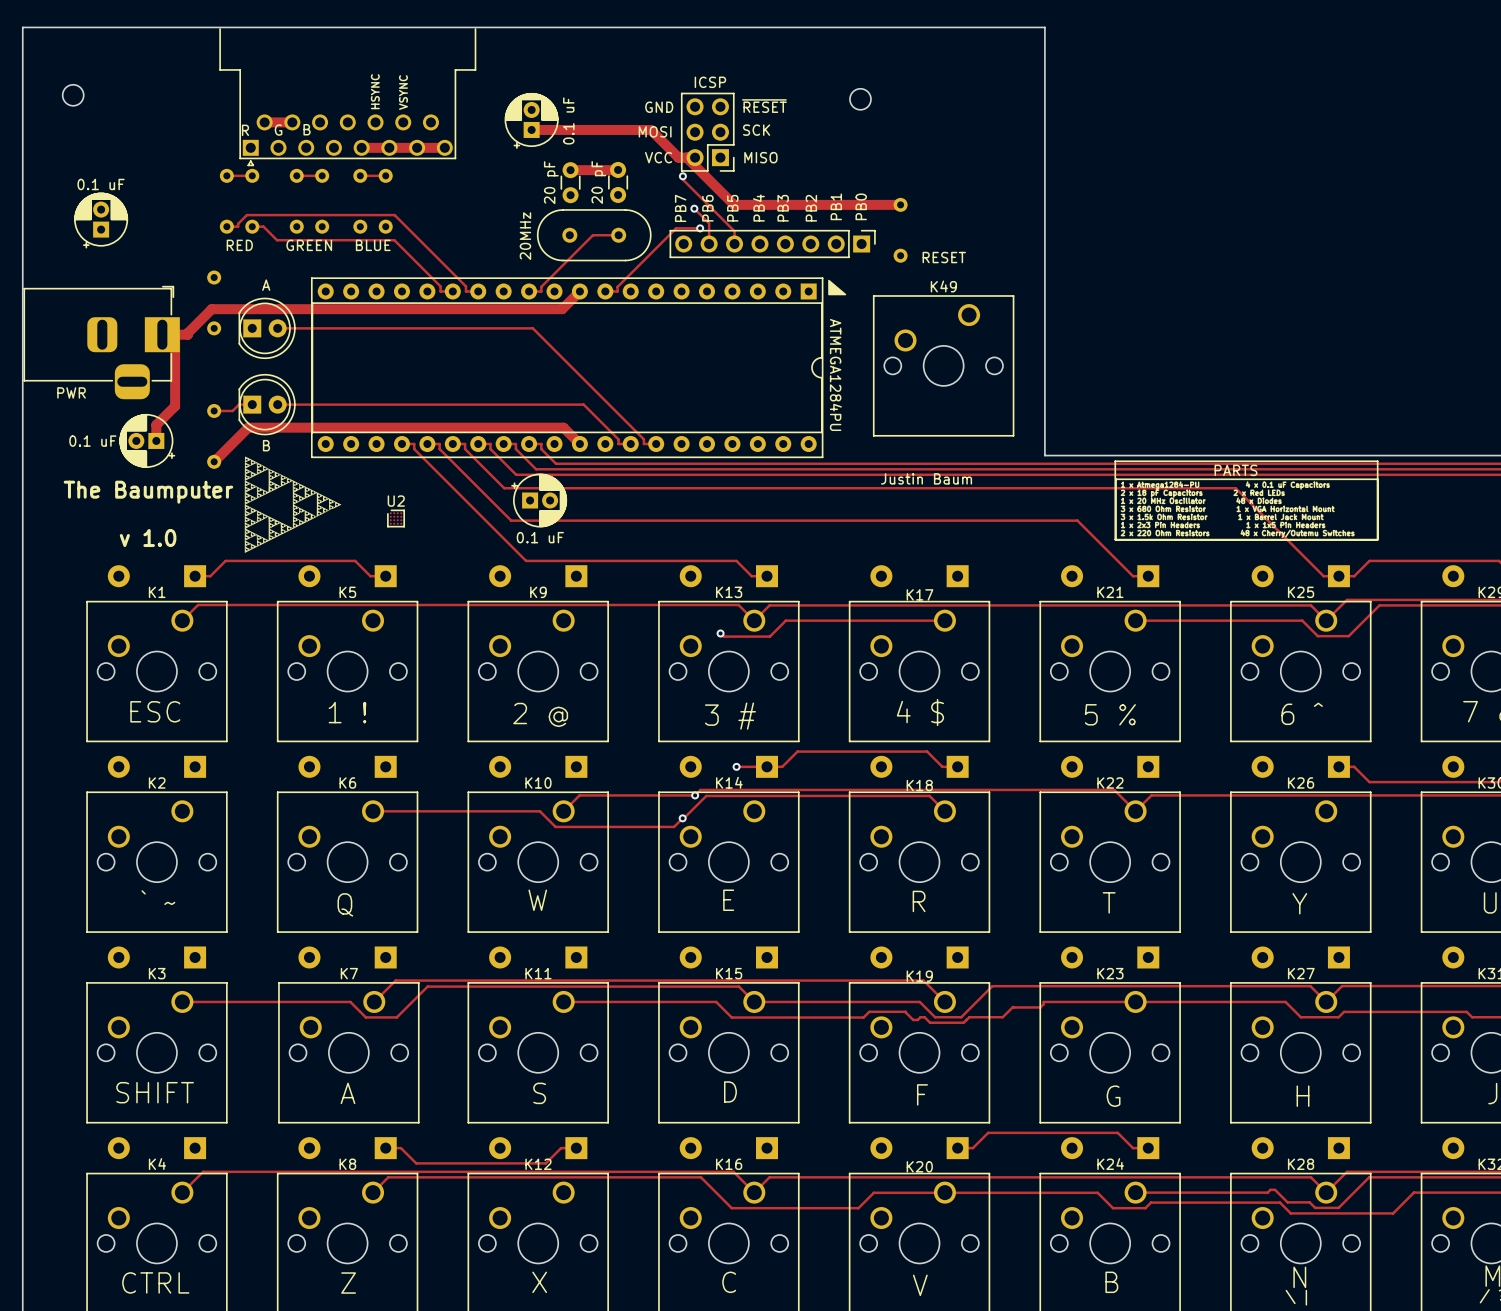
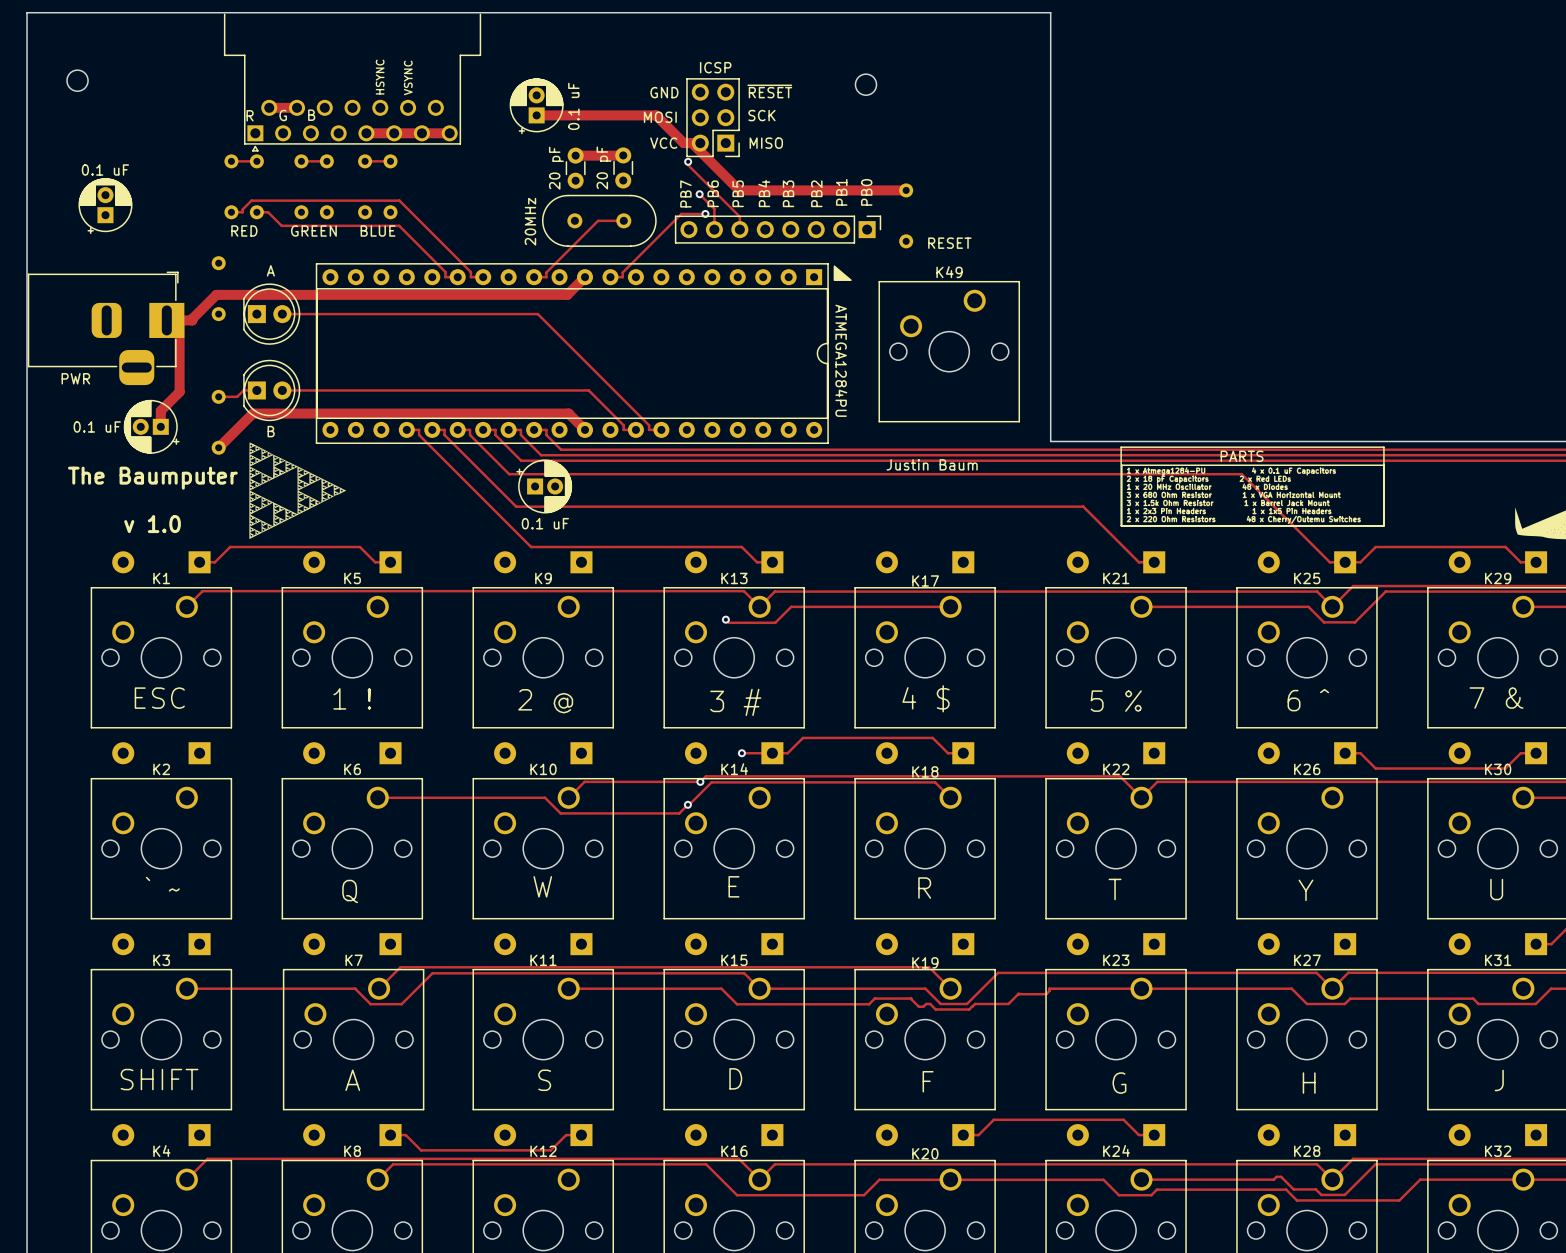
U2: (396, 518) -> none

